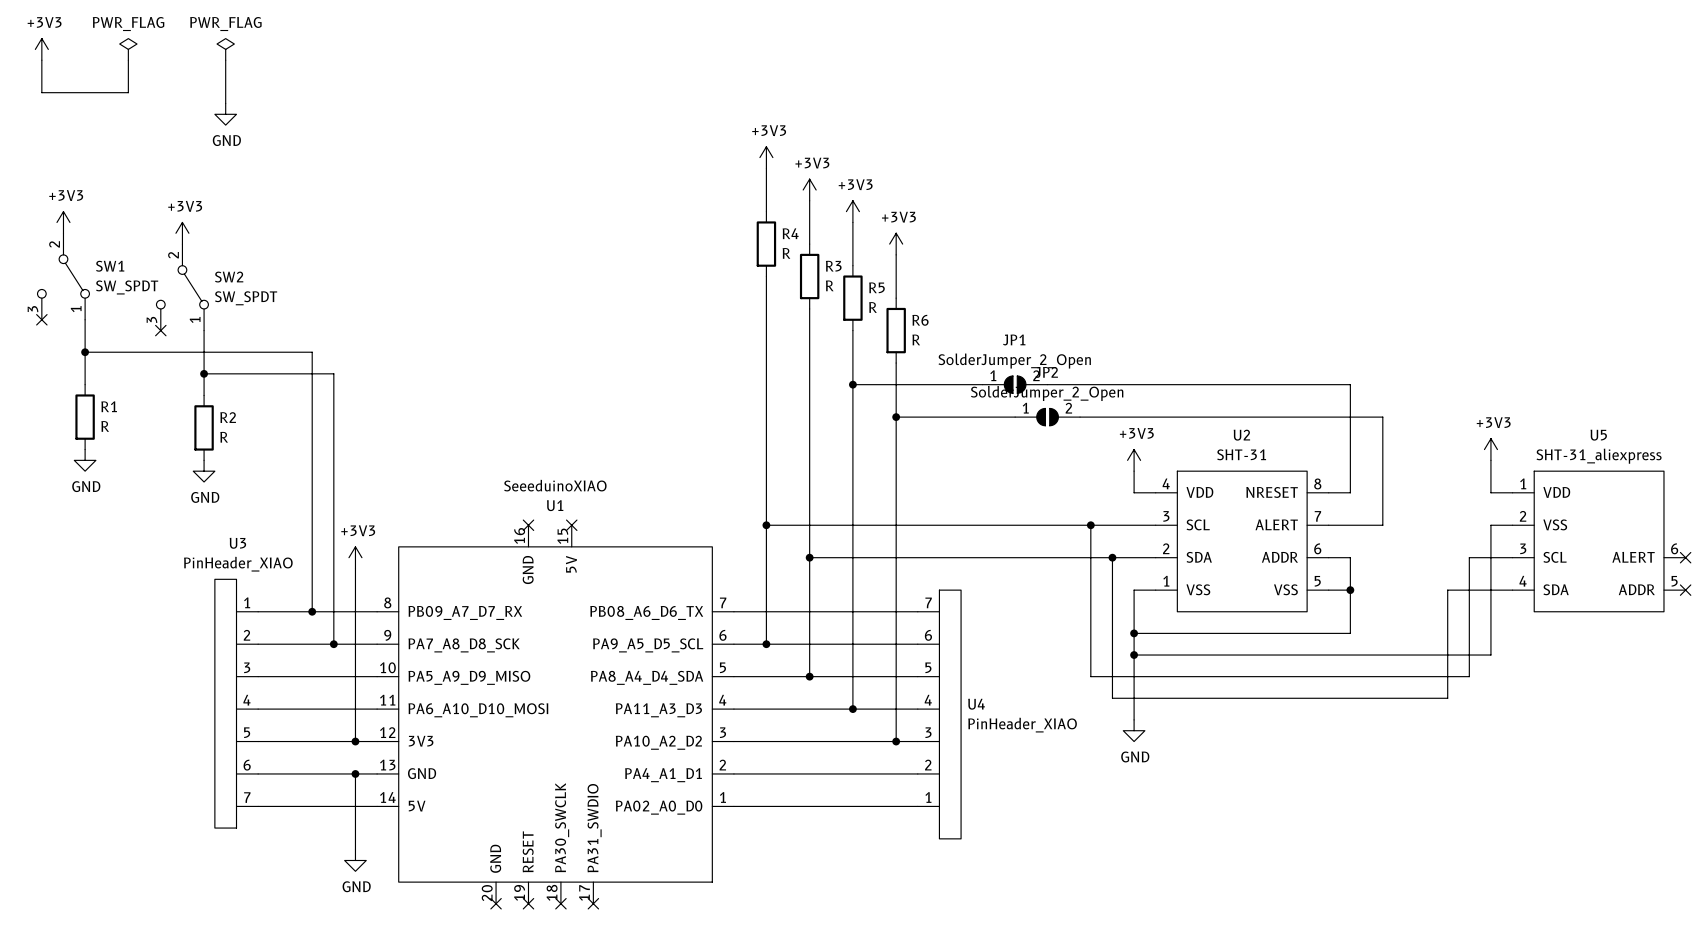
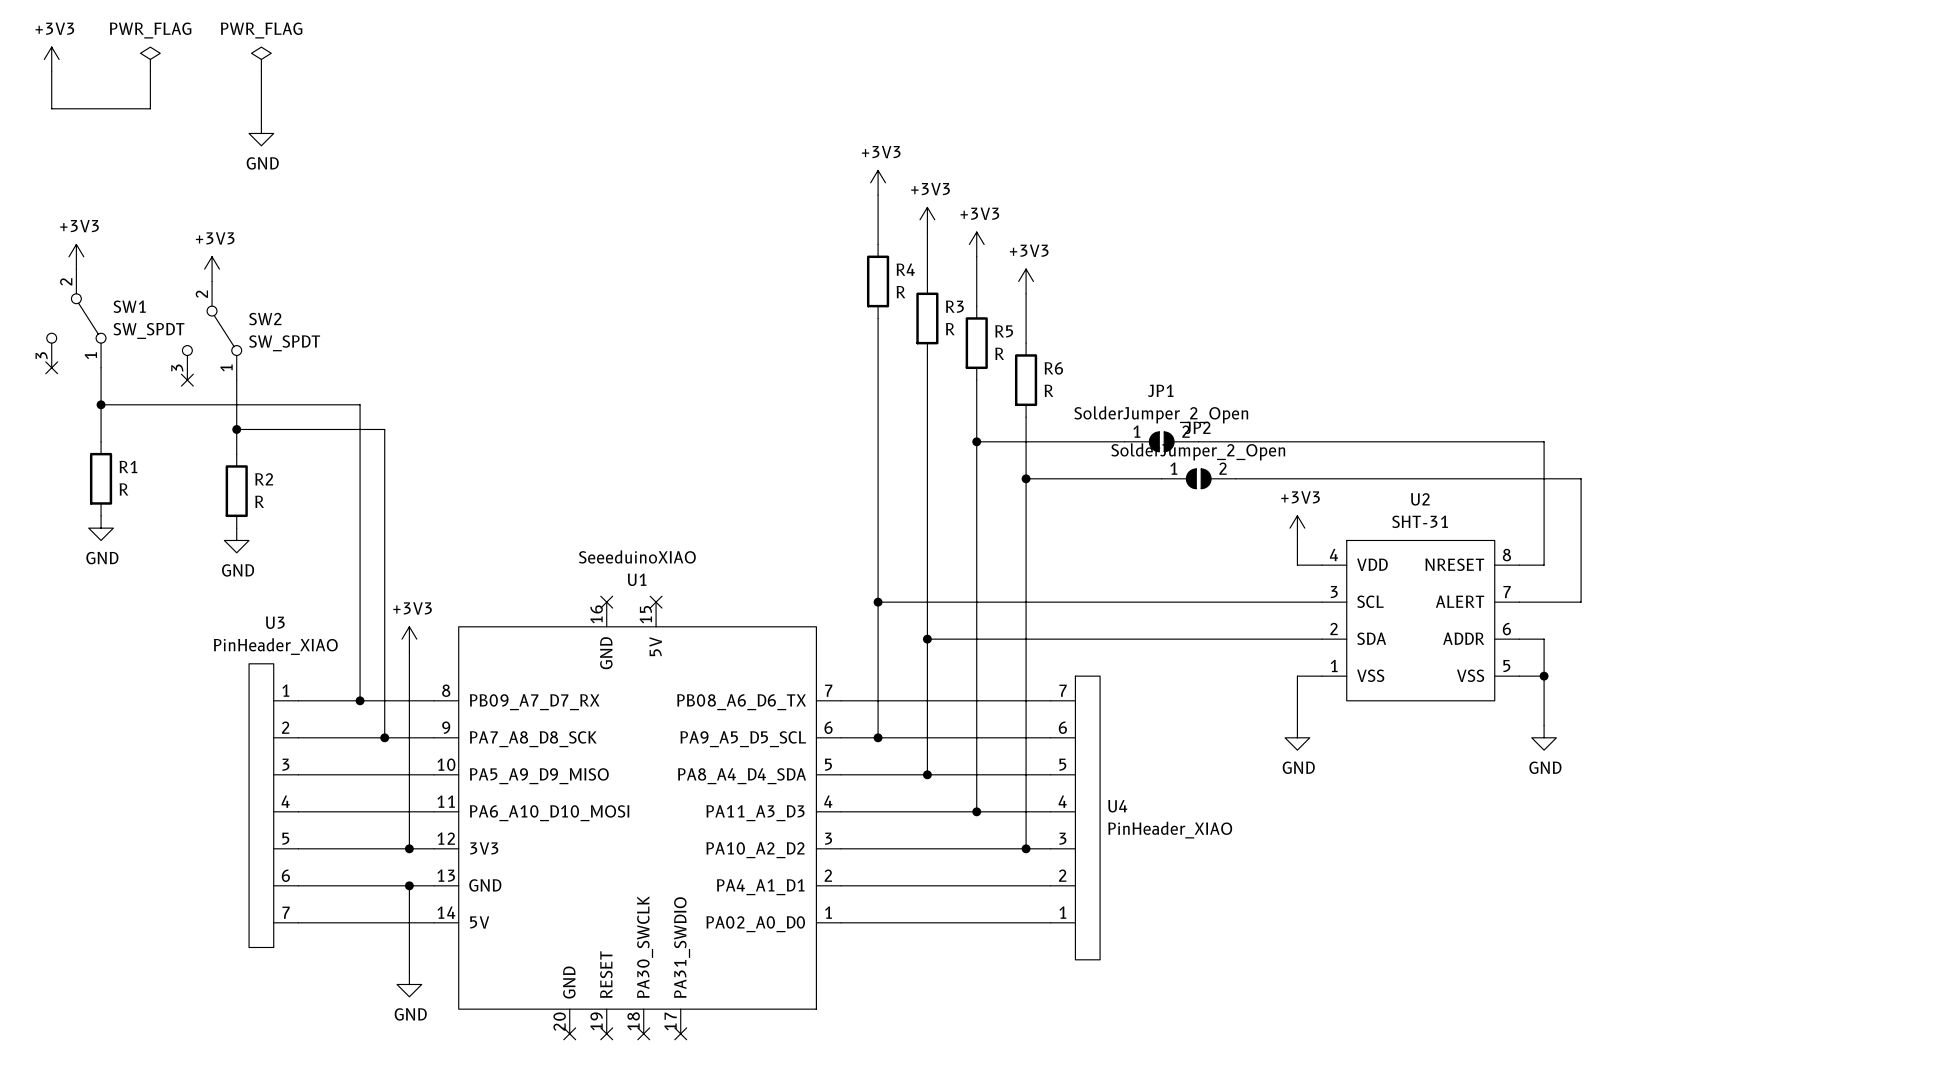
power symbol: +3V3 (1490, 449) -> none
wire: (1490, 460) (1490, 492) (1512, 492) -> none
wire: (1090, 525) (1090, 676) (1469, 676) (1469, 557) (1512, 557) -> none
junction: (1090, 525) -> none
wire: (1512, 525) (1490, 525) (1490, 655) (1134, 655) -> none
U5: SHT-31_aliexpress (1599, 541) -> none
wire: (1112, 557) (1112, 698) (1447, 698) (1447, 590) (1512, 590) -> none
junction: (1112, 557) -> none
no-connect mark: (1685, 557) -> none
no-connect mark: (1685, 590) -> none
junction: (1134, 633) -> none
wire: (1350, 633) (1134, 633) (1134, 719) -> none
power symbol: none -> GND (1544, 737)
junction: (1134, 655) -> none
power symbol position: GND (1134, 730) -> GND (1297, 737)

